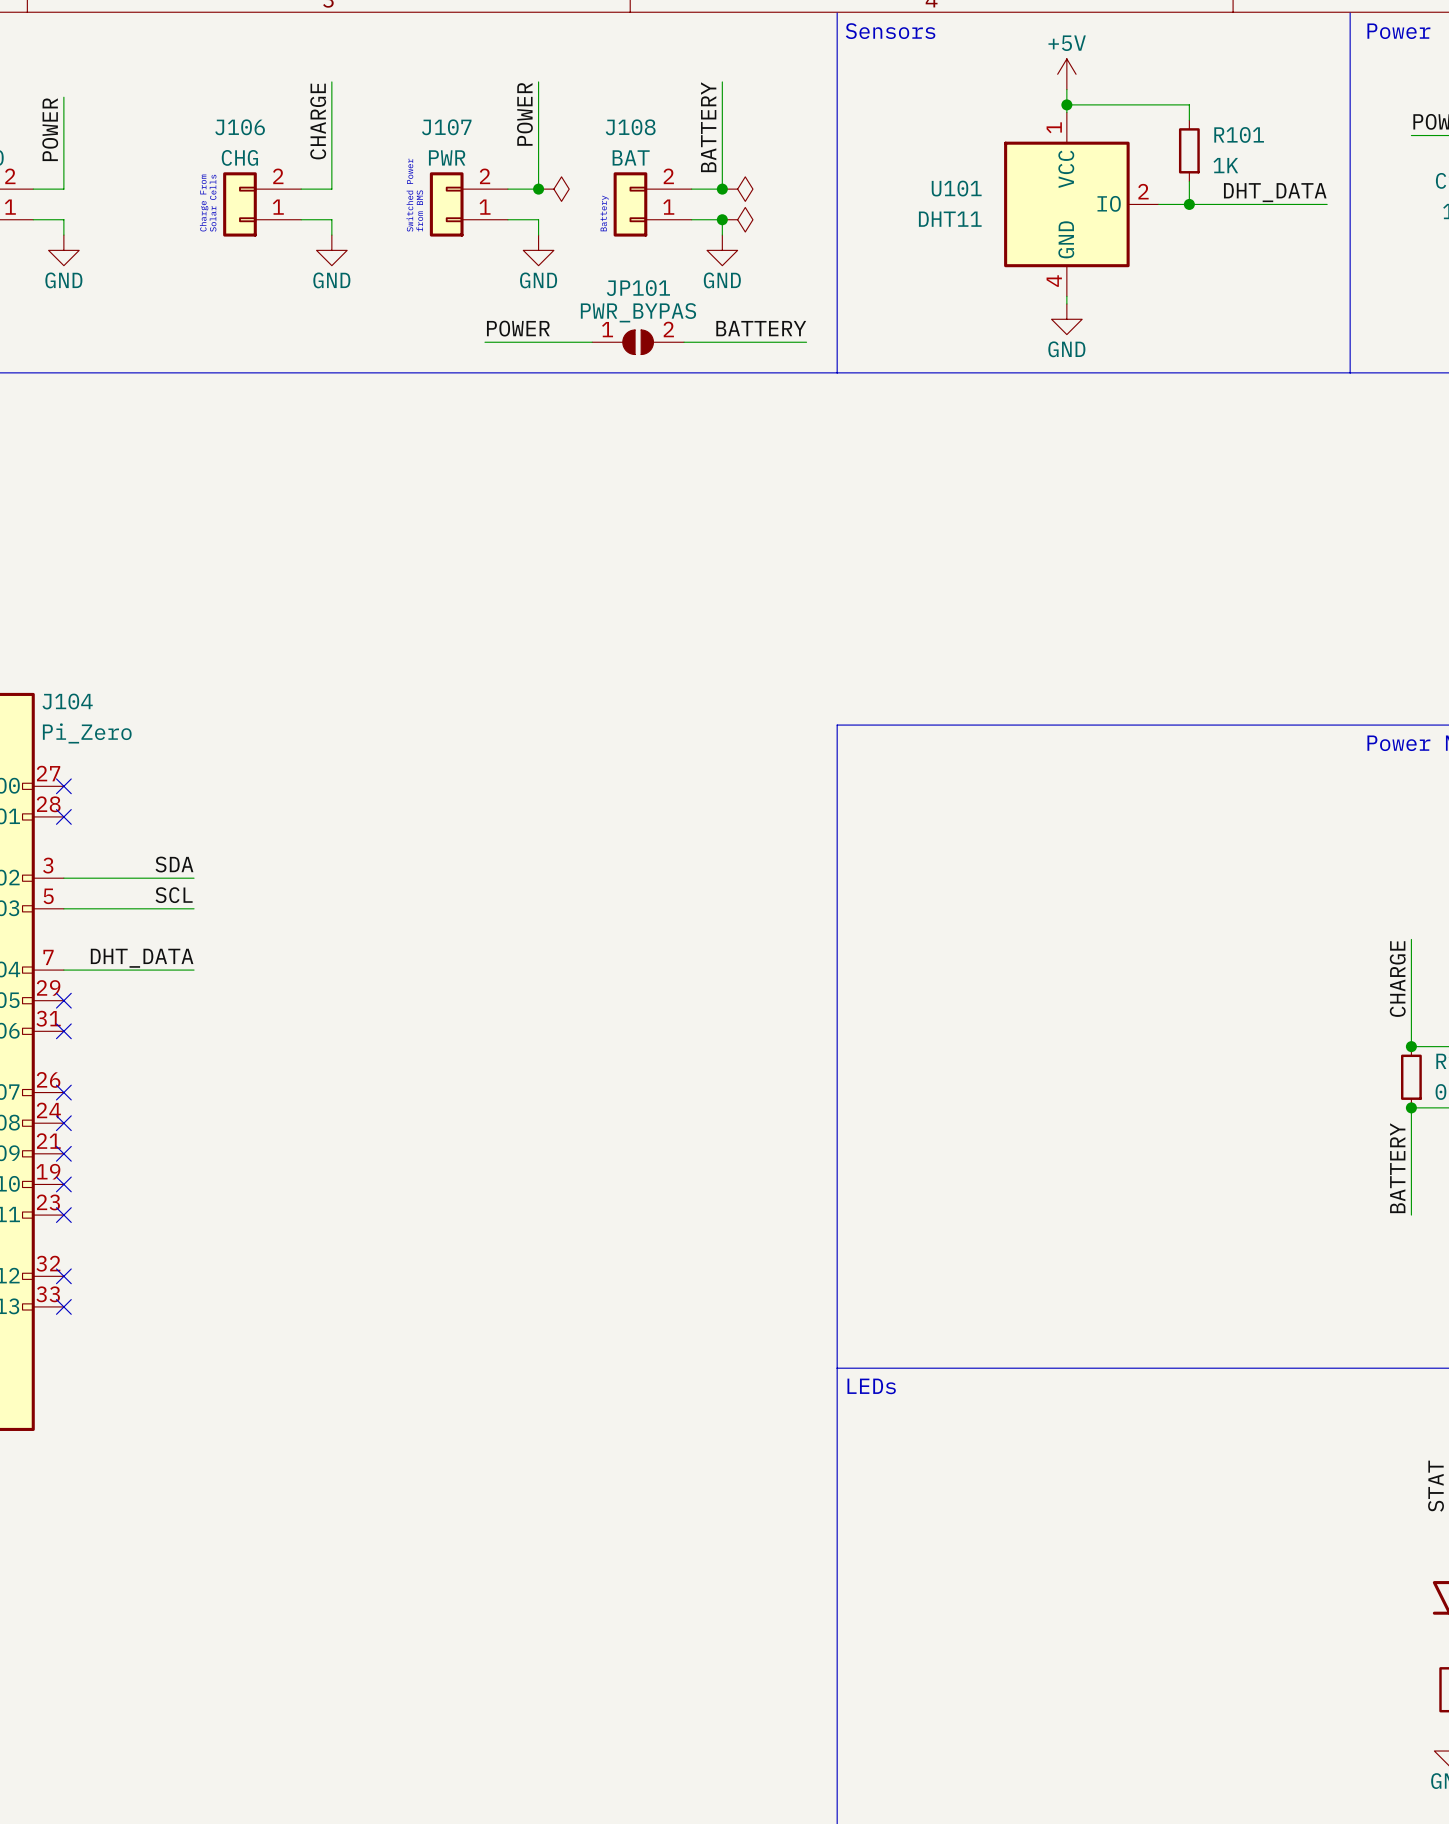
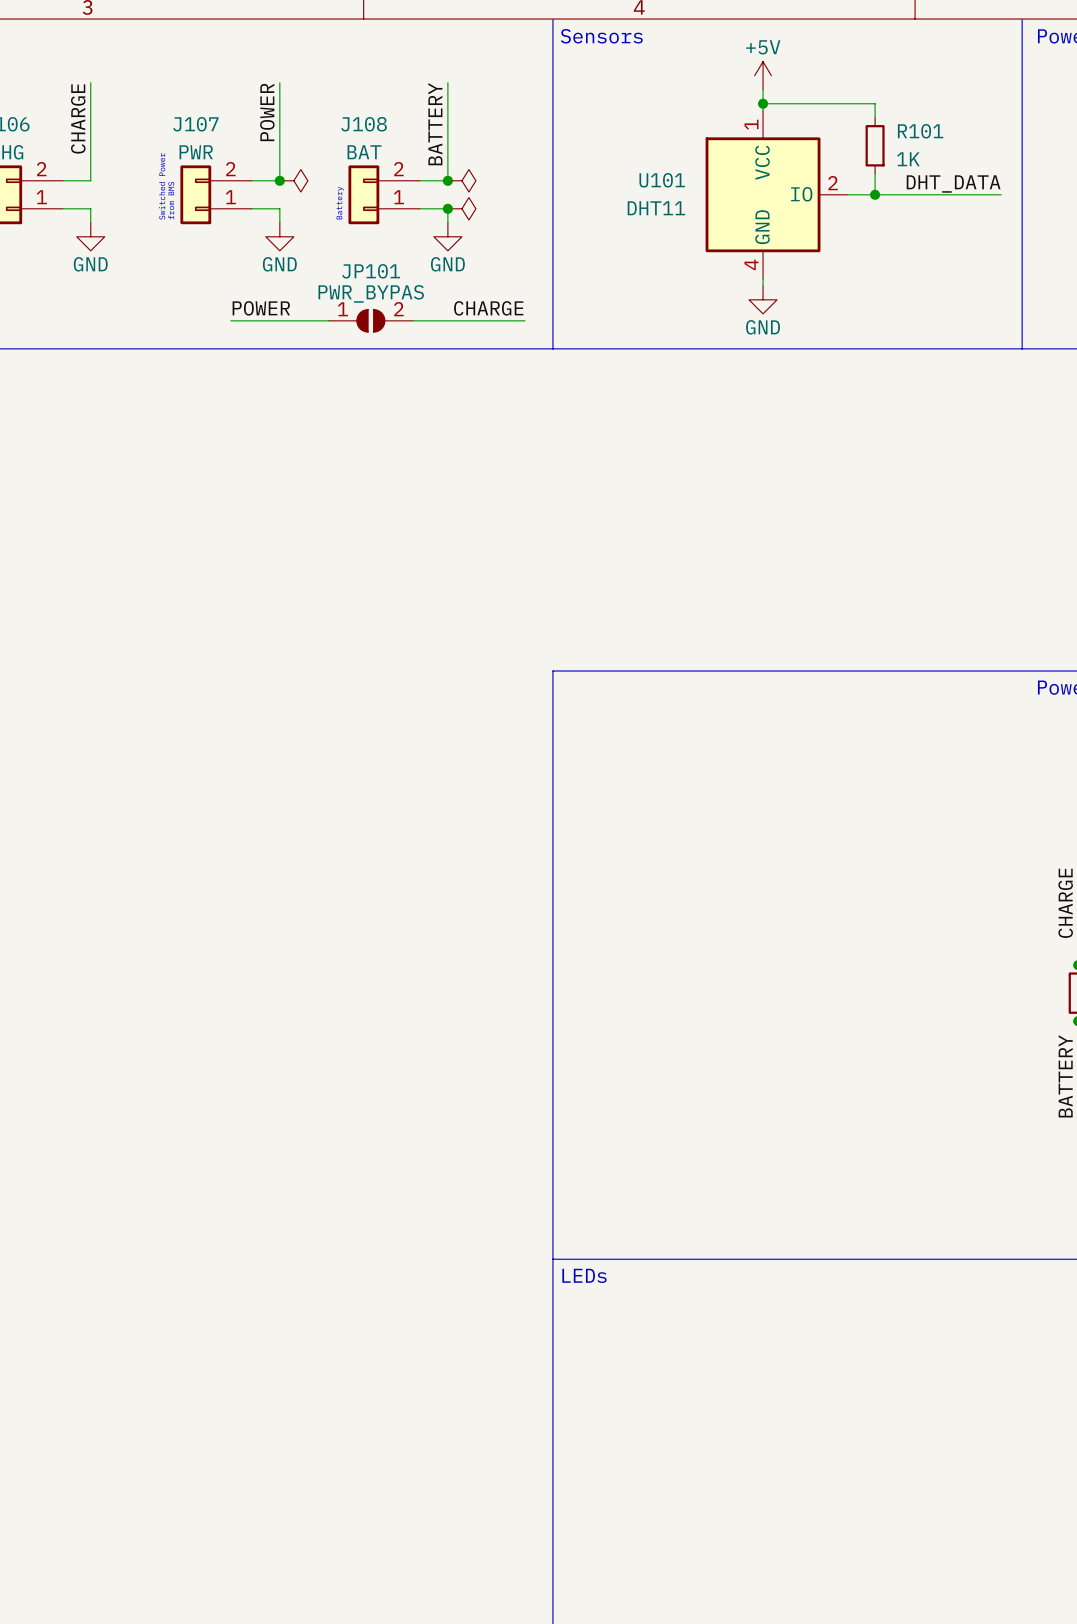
label: BATTERY (761, 328) -> CHARGE (488, 308)

